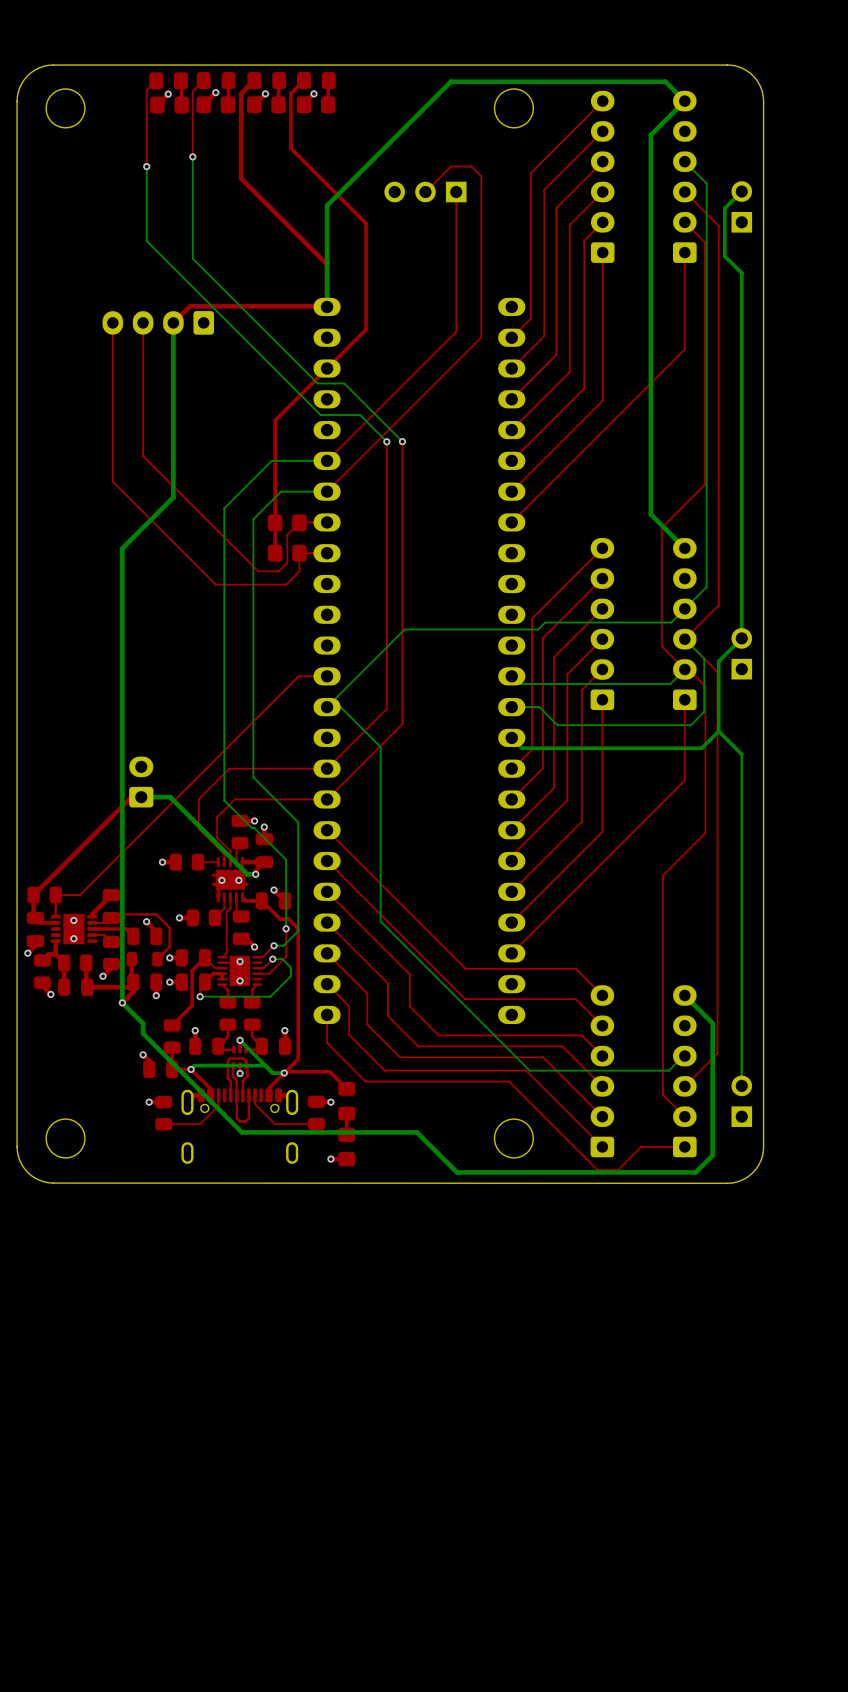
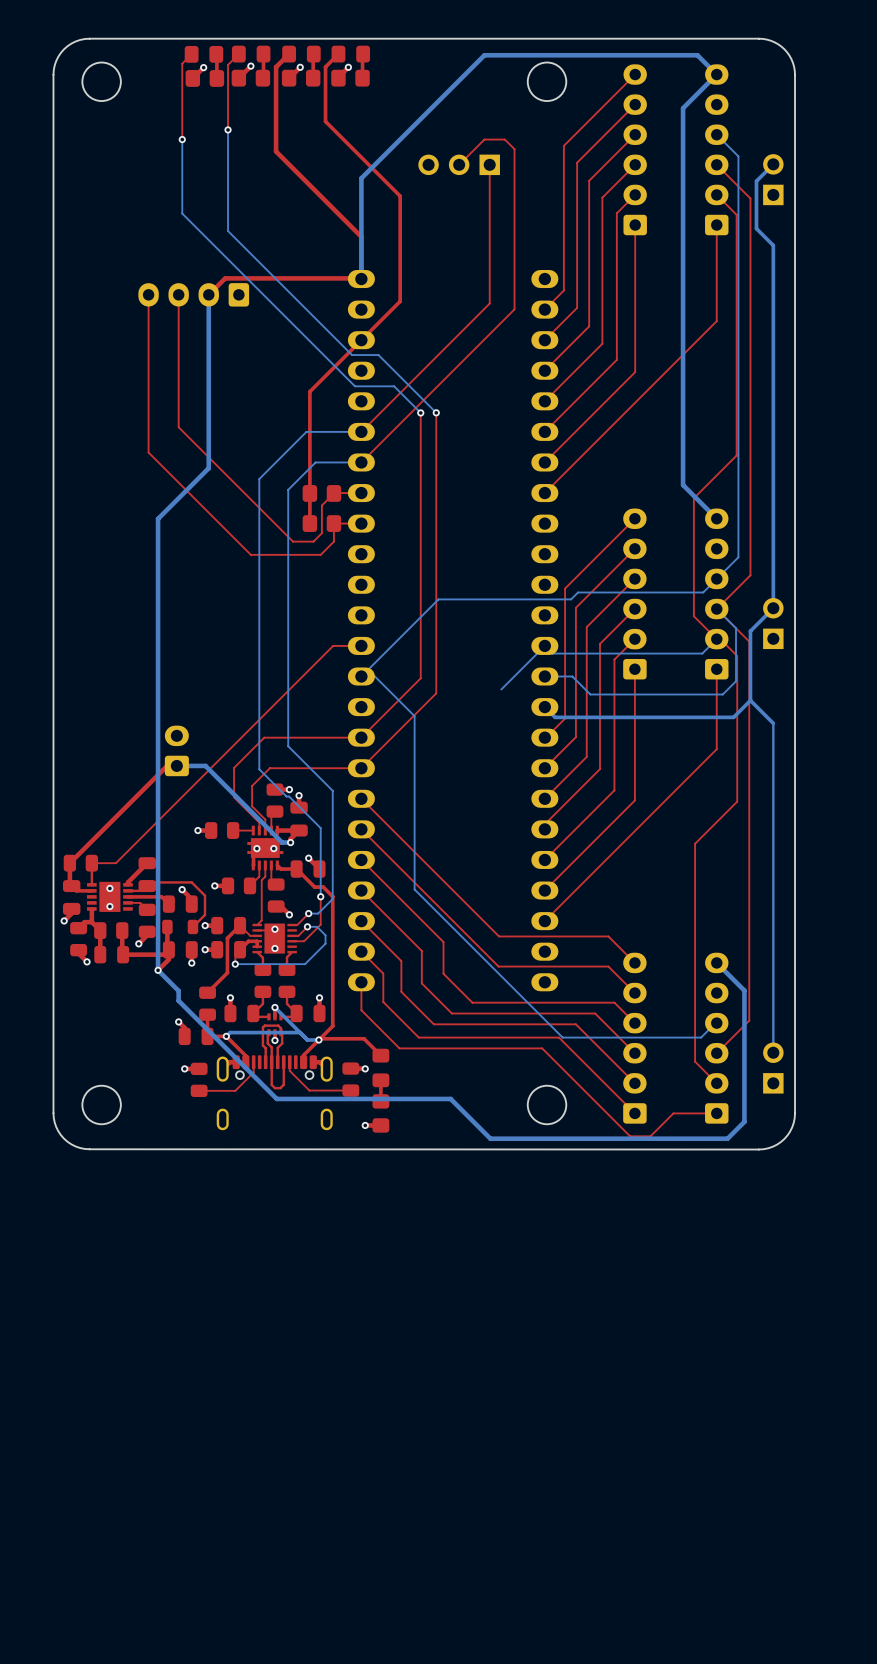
bottom track: none -> (544, 645) (501, 689)

